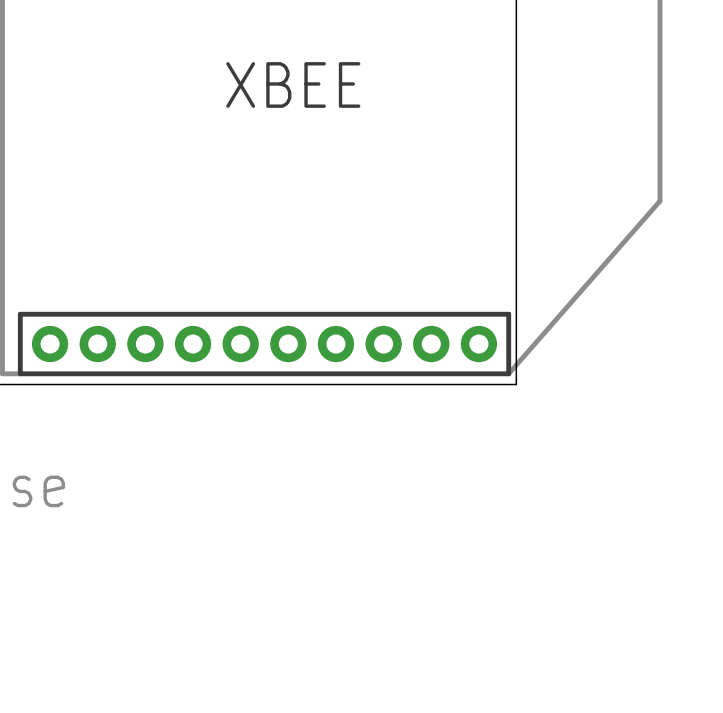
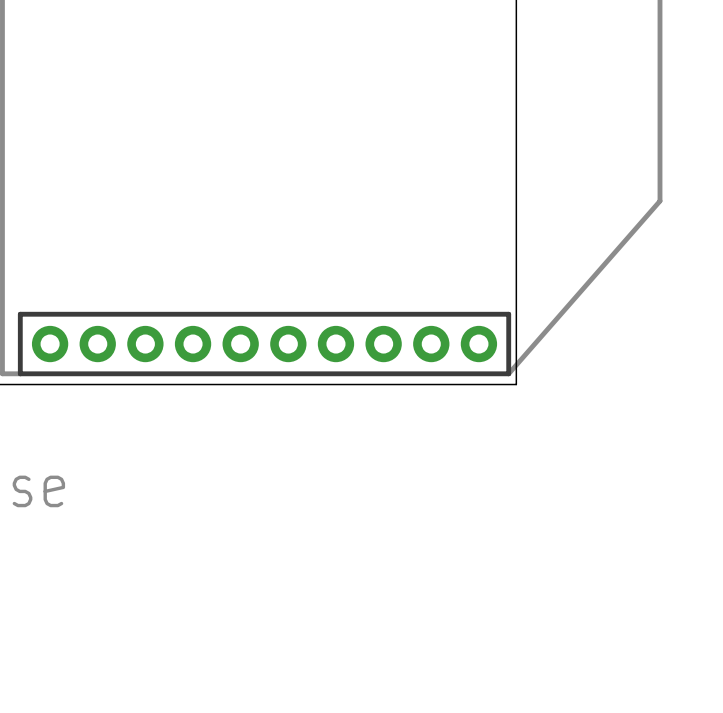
text: XBEE (293, 84) -> none

